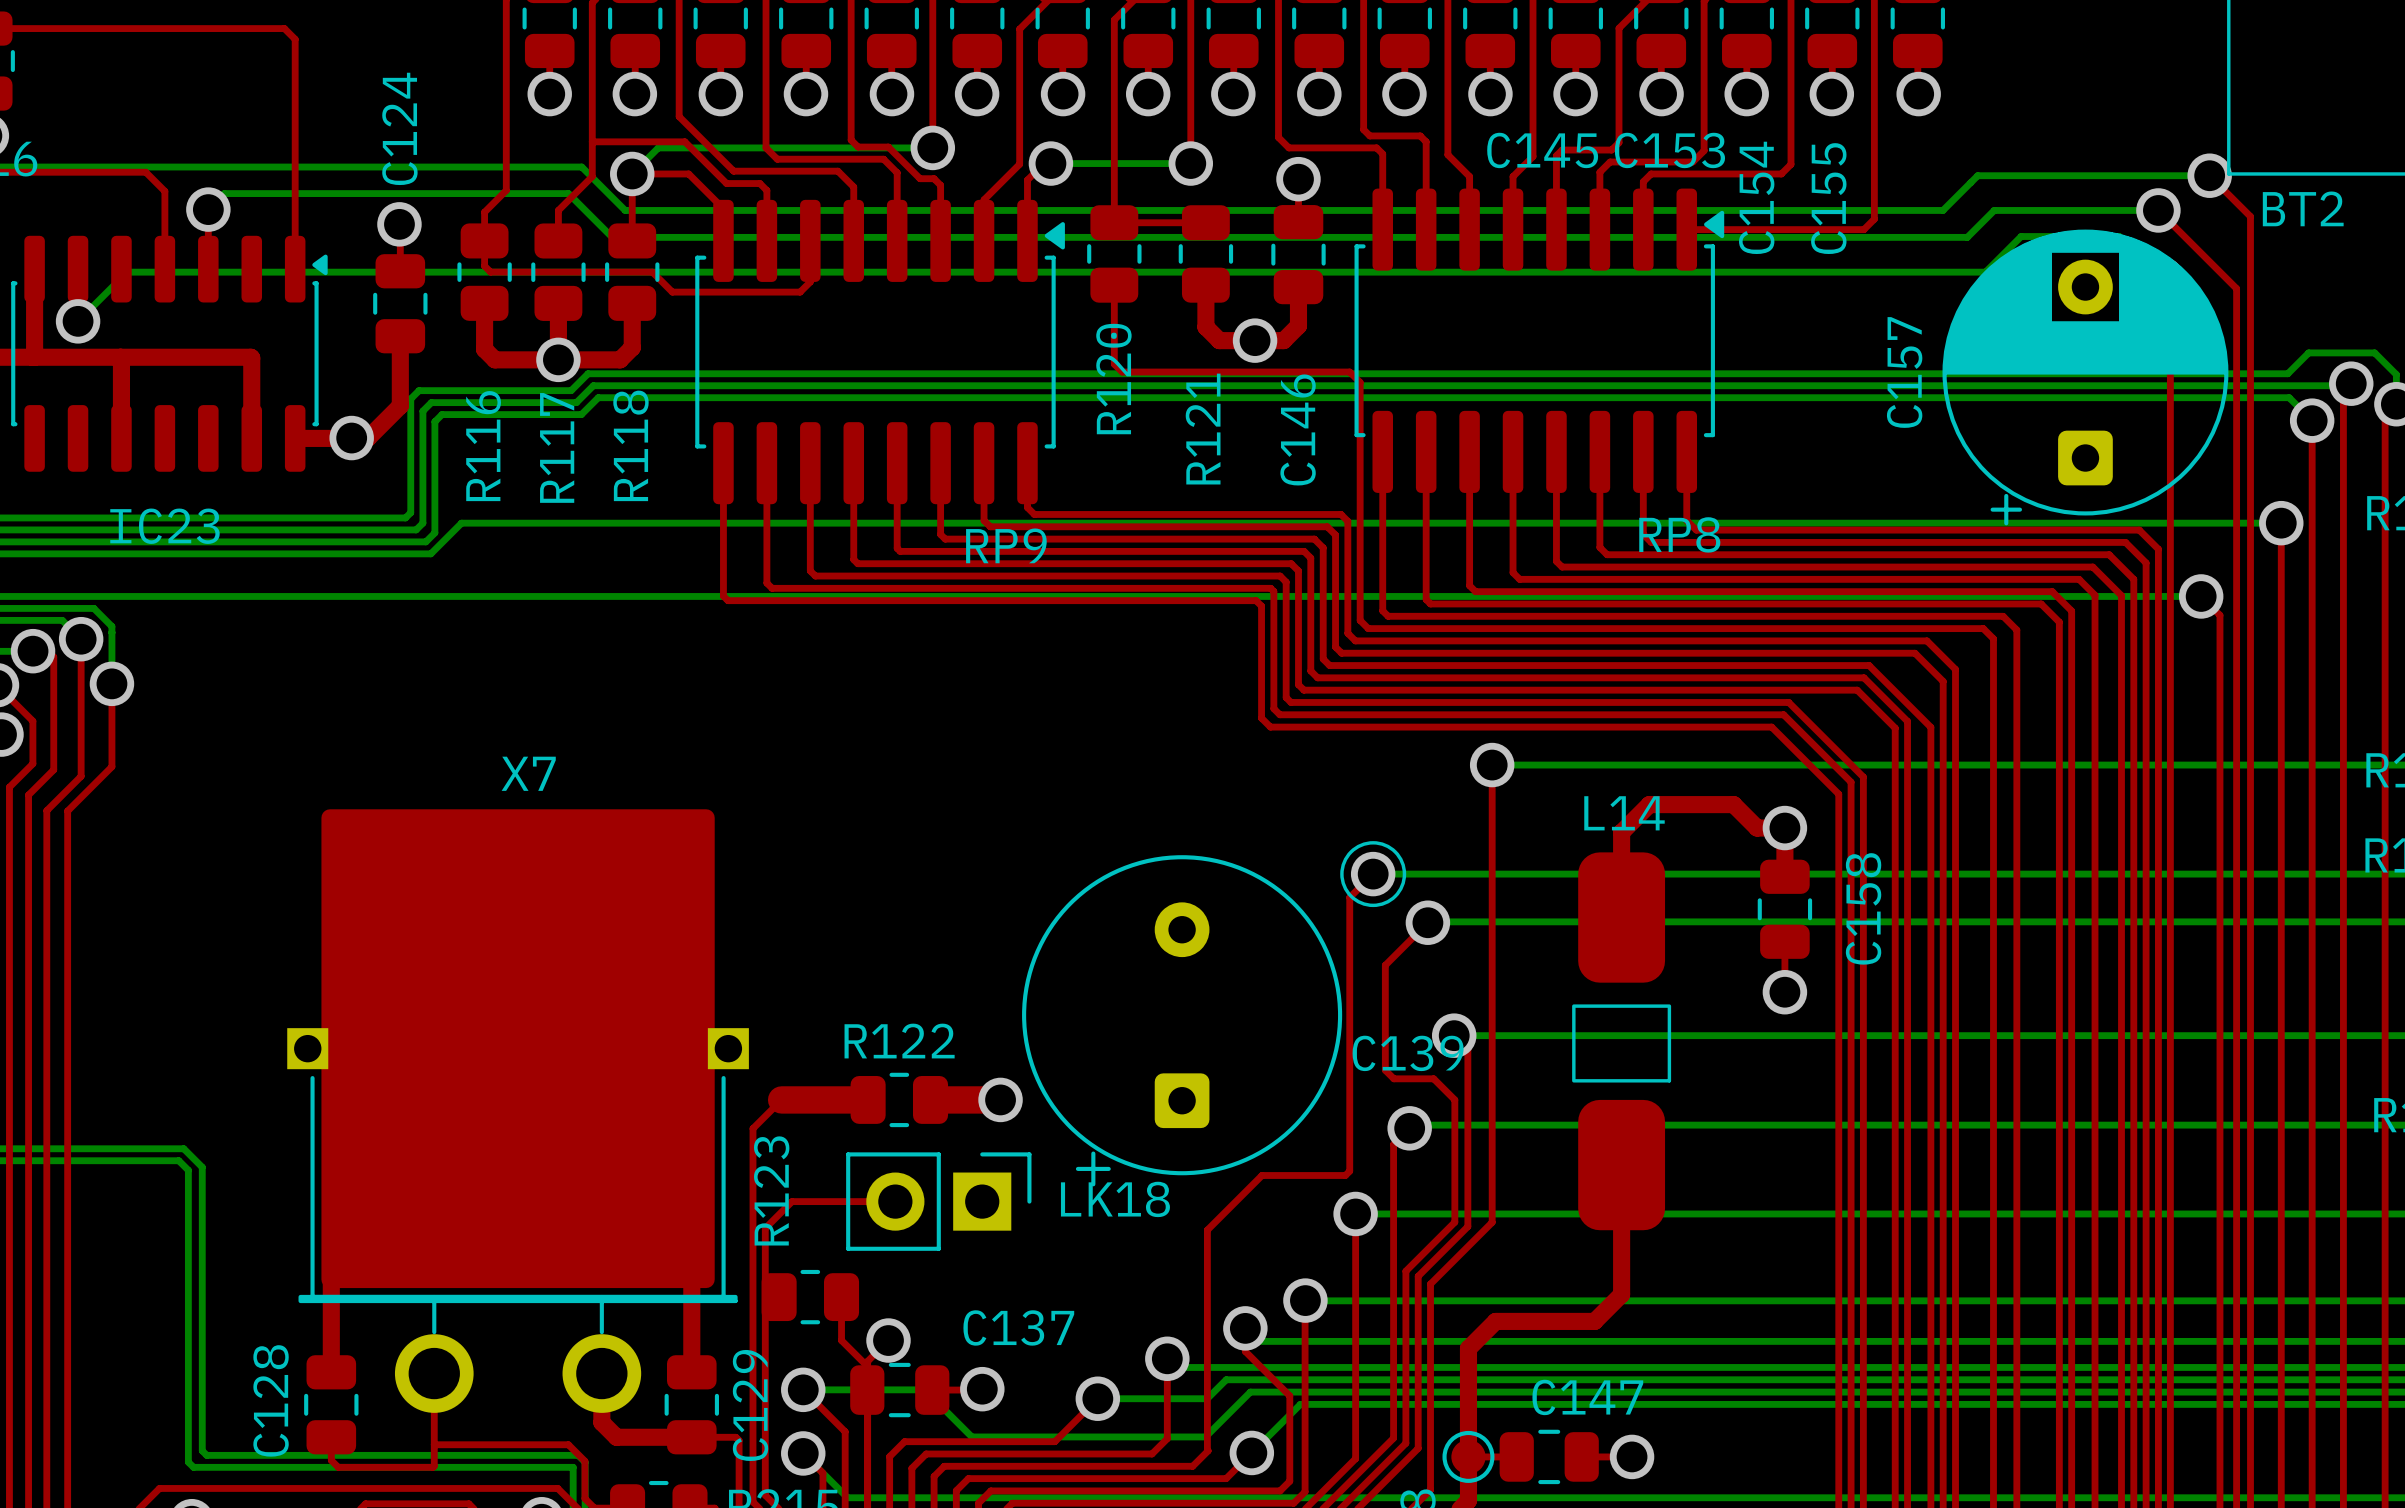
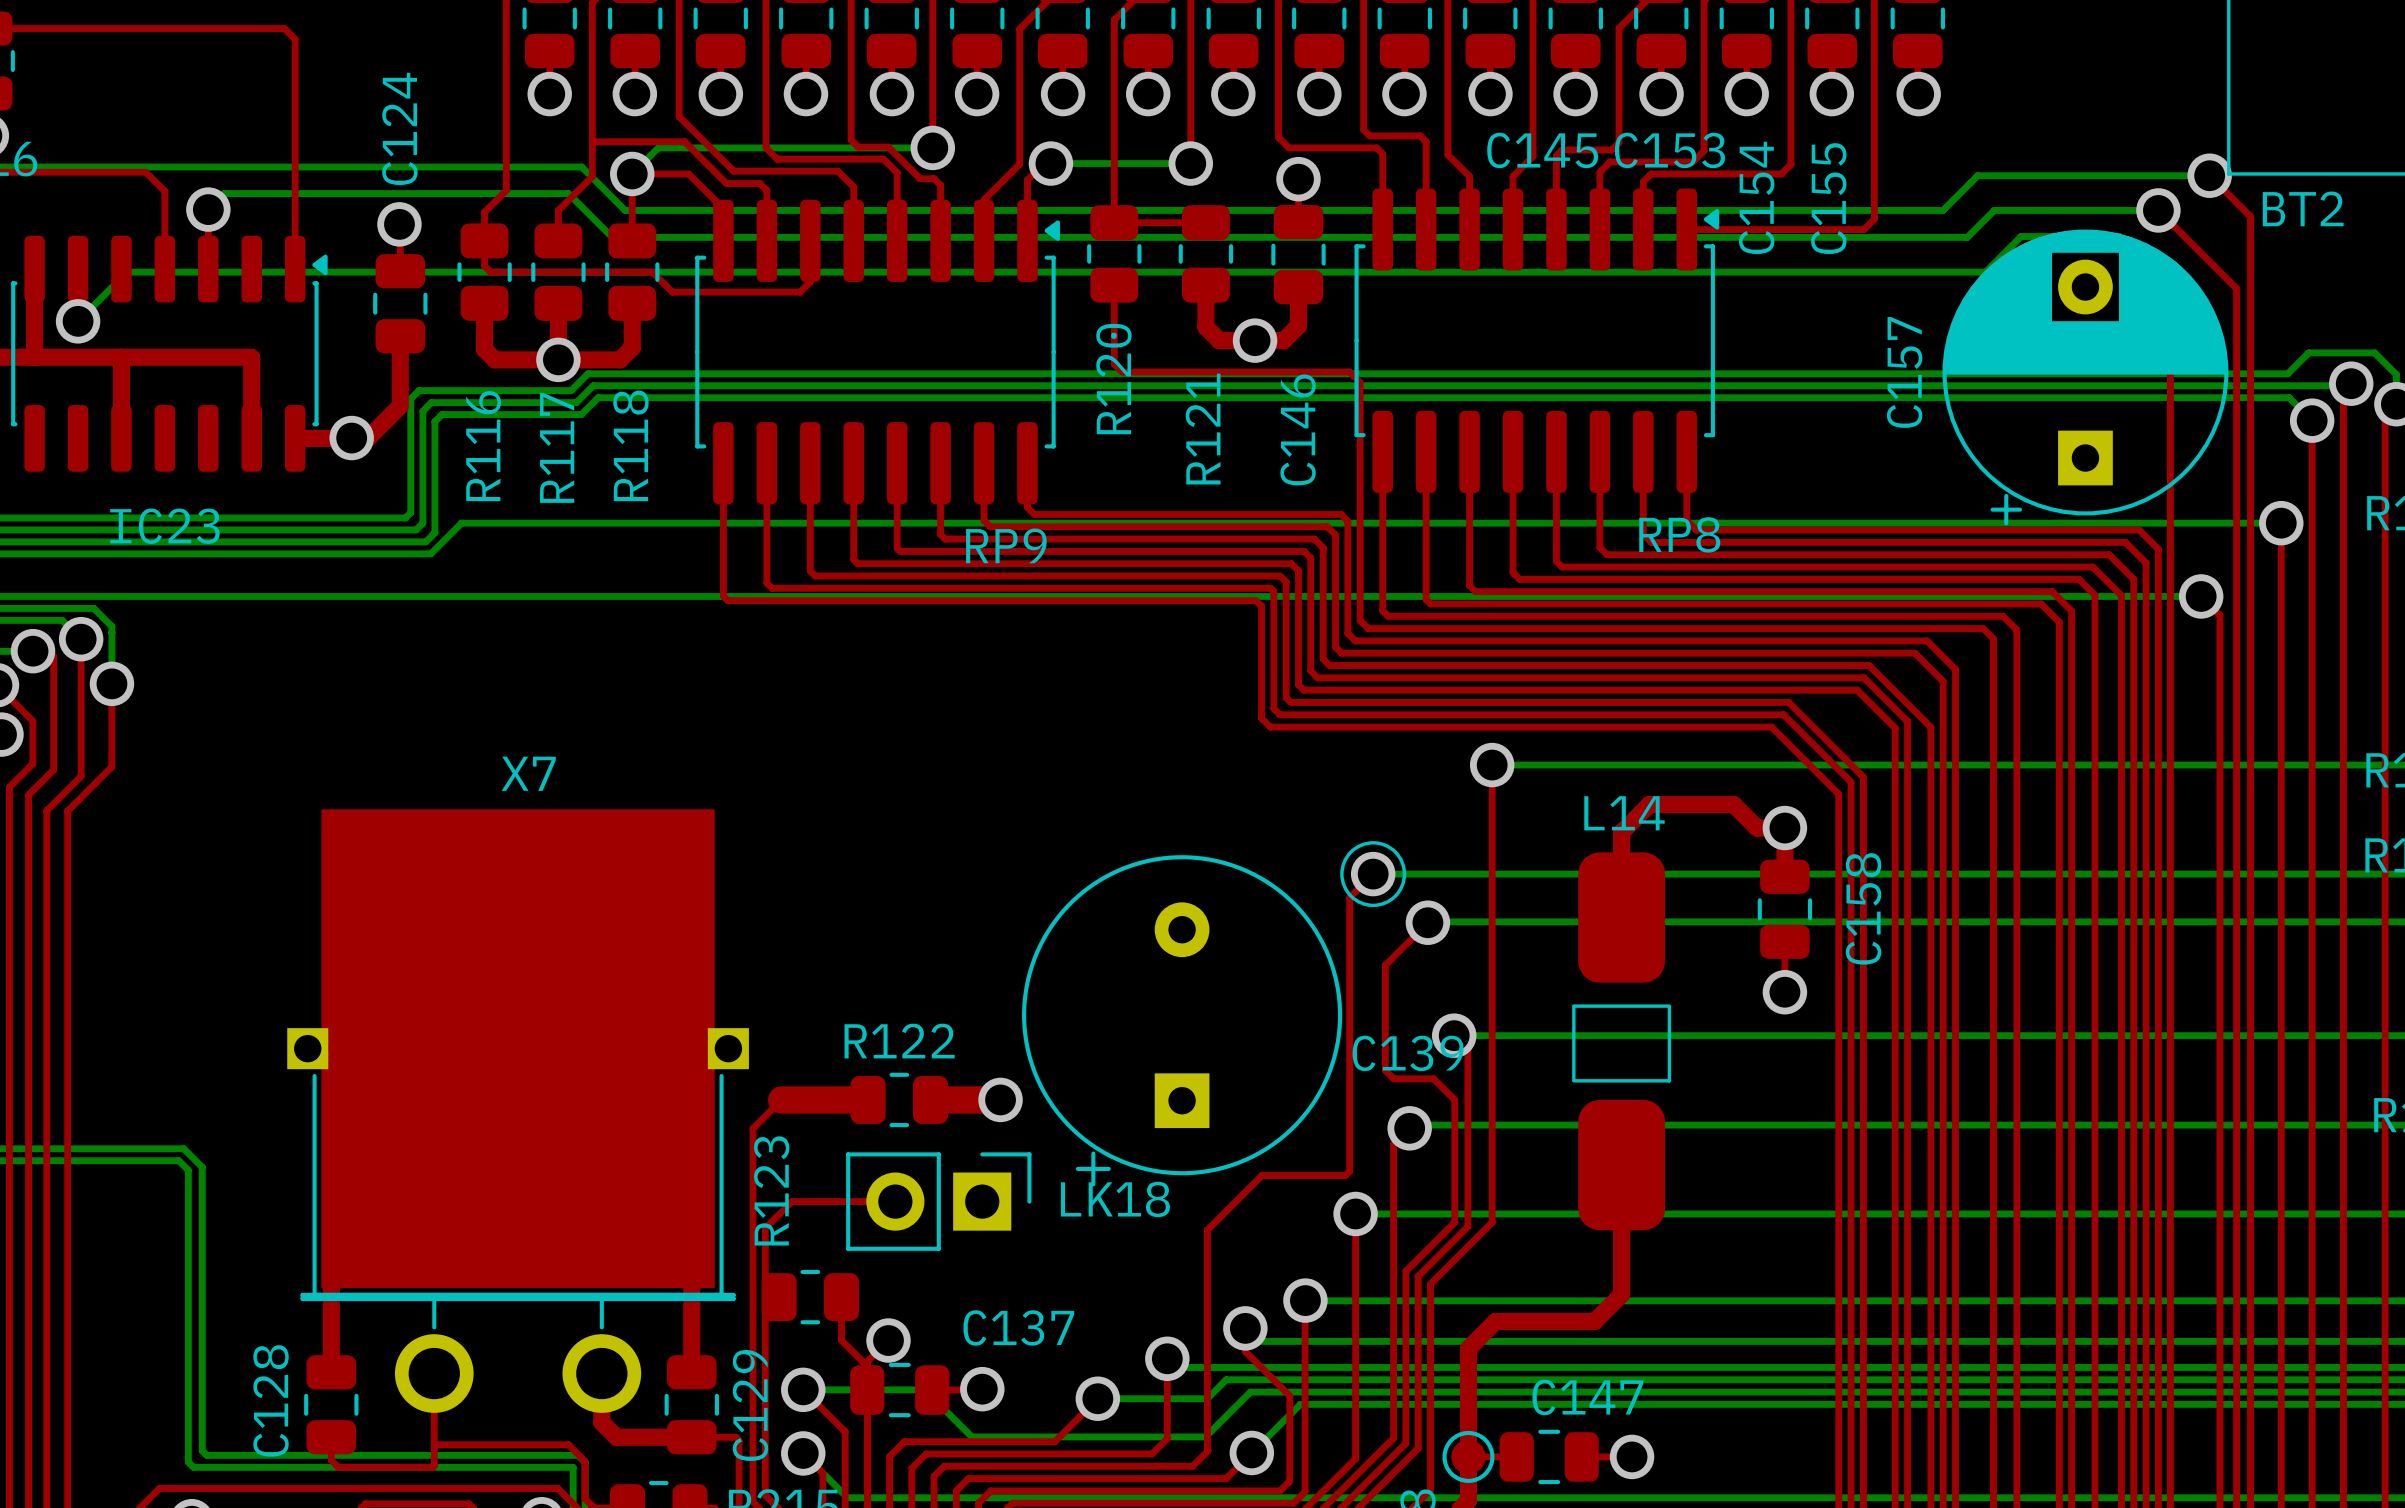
RP8 footprint: [1354, 188, 1725, 493] -> [1354, 188, 1720, 493]
RP9 footprint: [695, 199, 1065, 505] -> [695, 199, 1060, 505]
C157 footprint: [1942, 229, 2229, 526] -> [1942, 229, 2229, 526]
X7 footprint: [287, 809, 749, 1413] -> [287, 809, 749, 1413]
C139 footprint: [1022, 855, 1343, 1187] -> [1022, 855, 1343, 1187]

